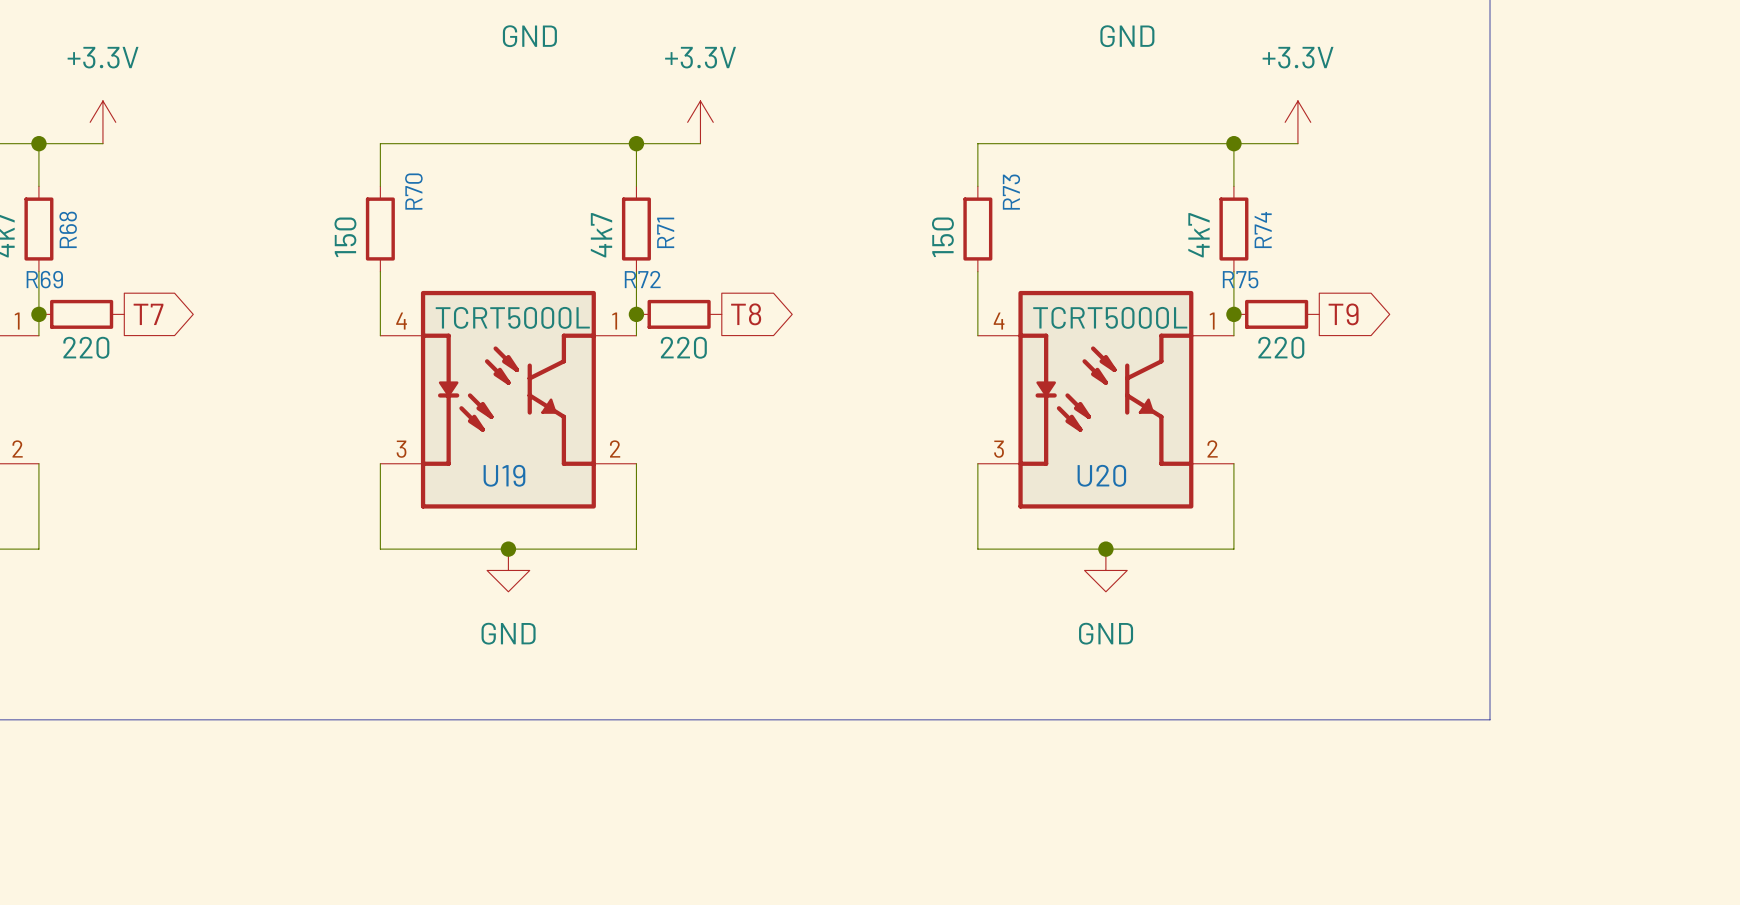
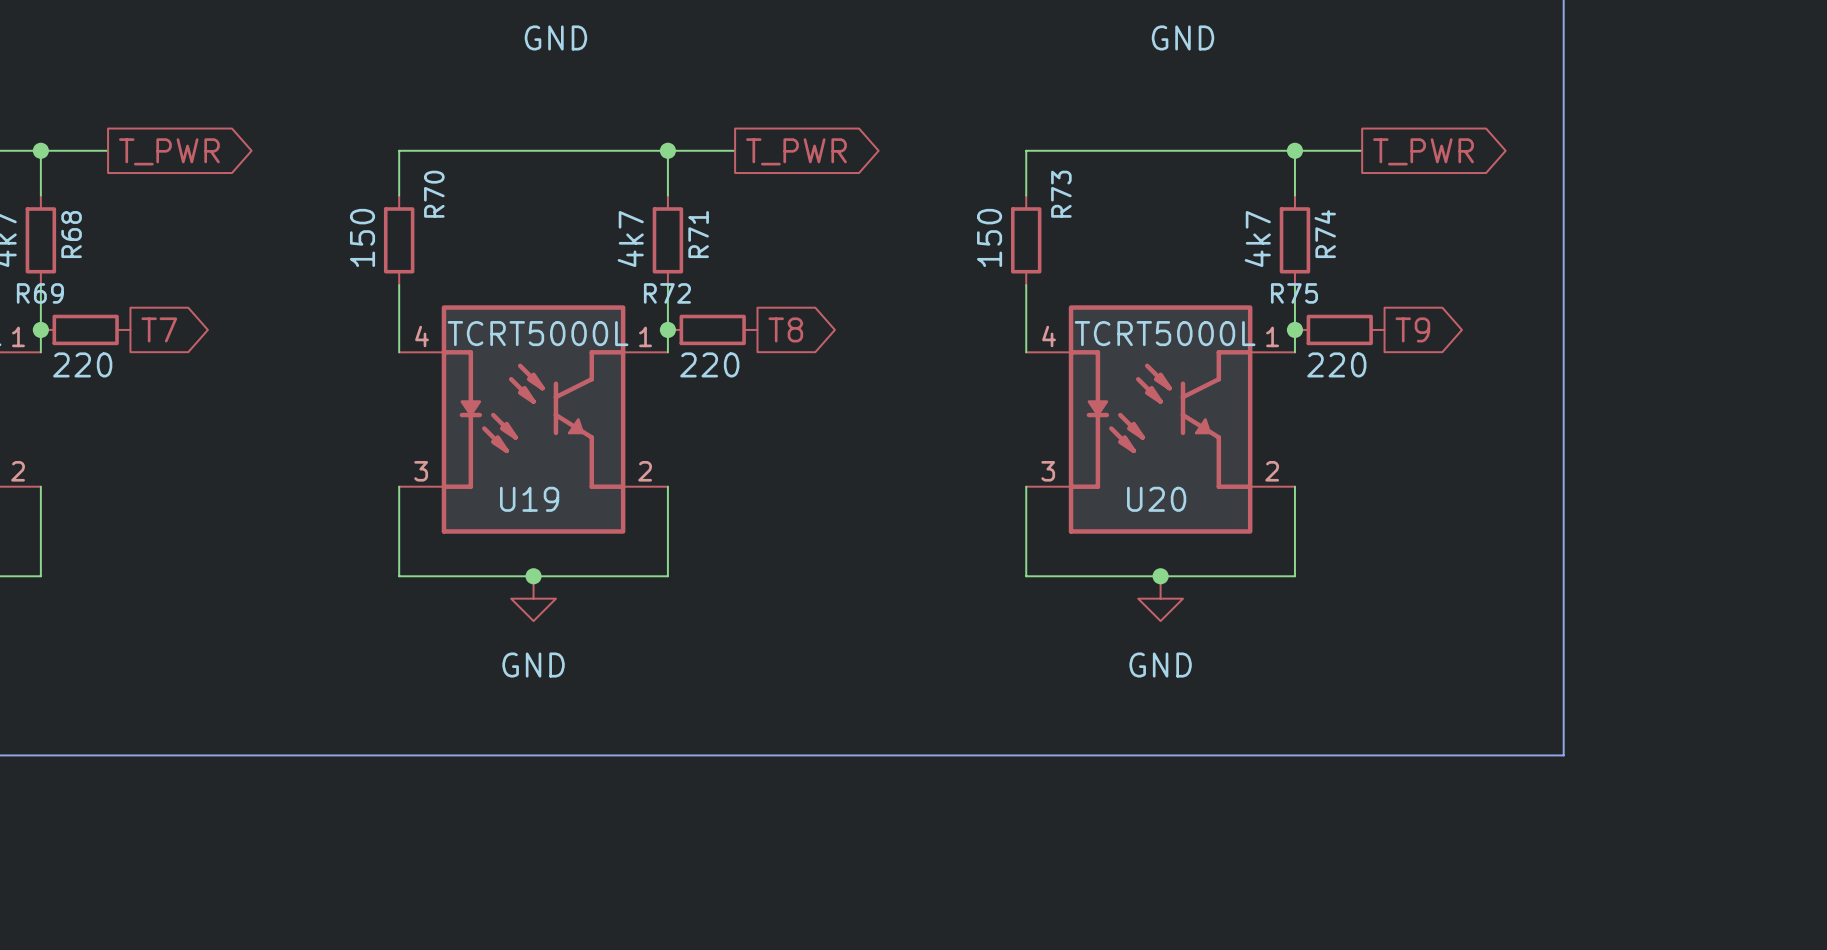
power symbol: +3.3V (102, 122) -> none
power symbol: +3.3V (700, 122) -> none
power symbol: +3.3V (1297, 122) -> none
global label: none -> T_PWR (169, 151)
global label: none -> T_PWR (796, 151)
global label: none -> T_PWR (1423, 151)

